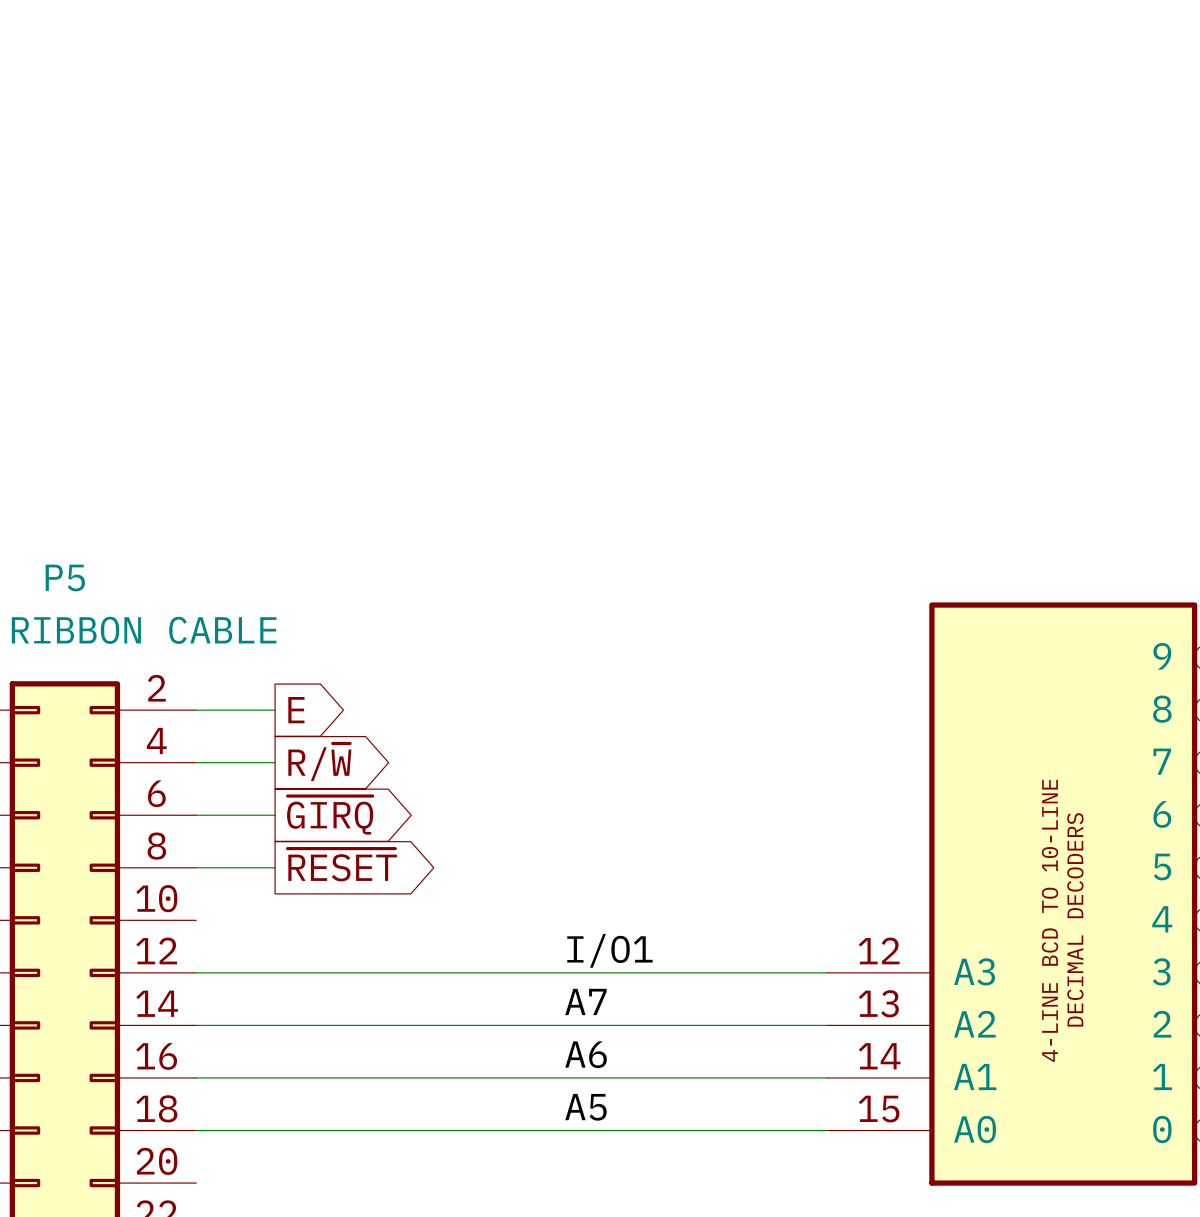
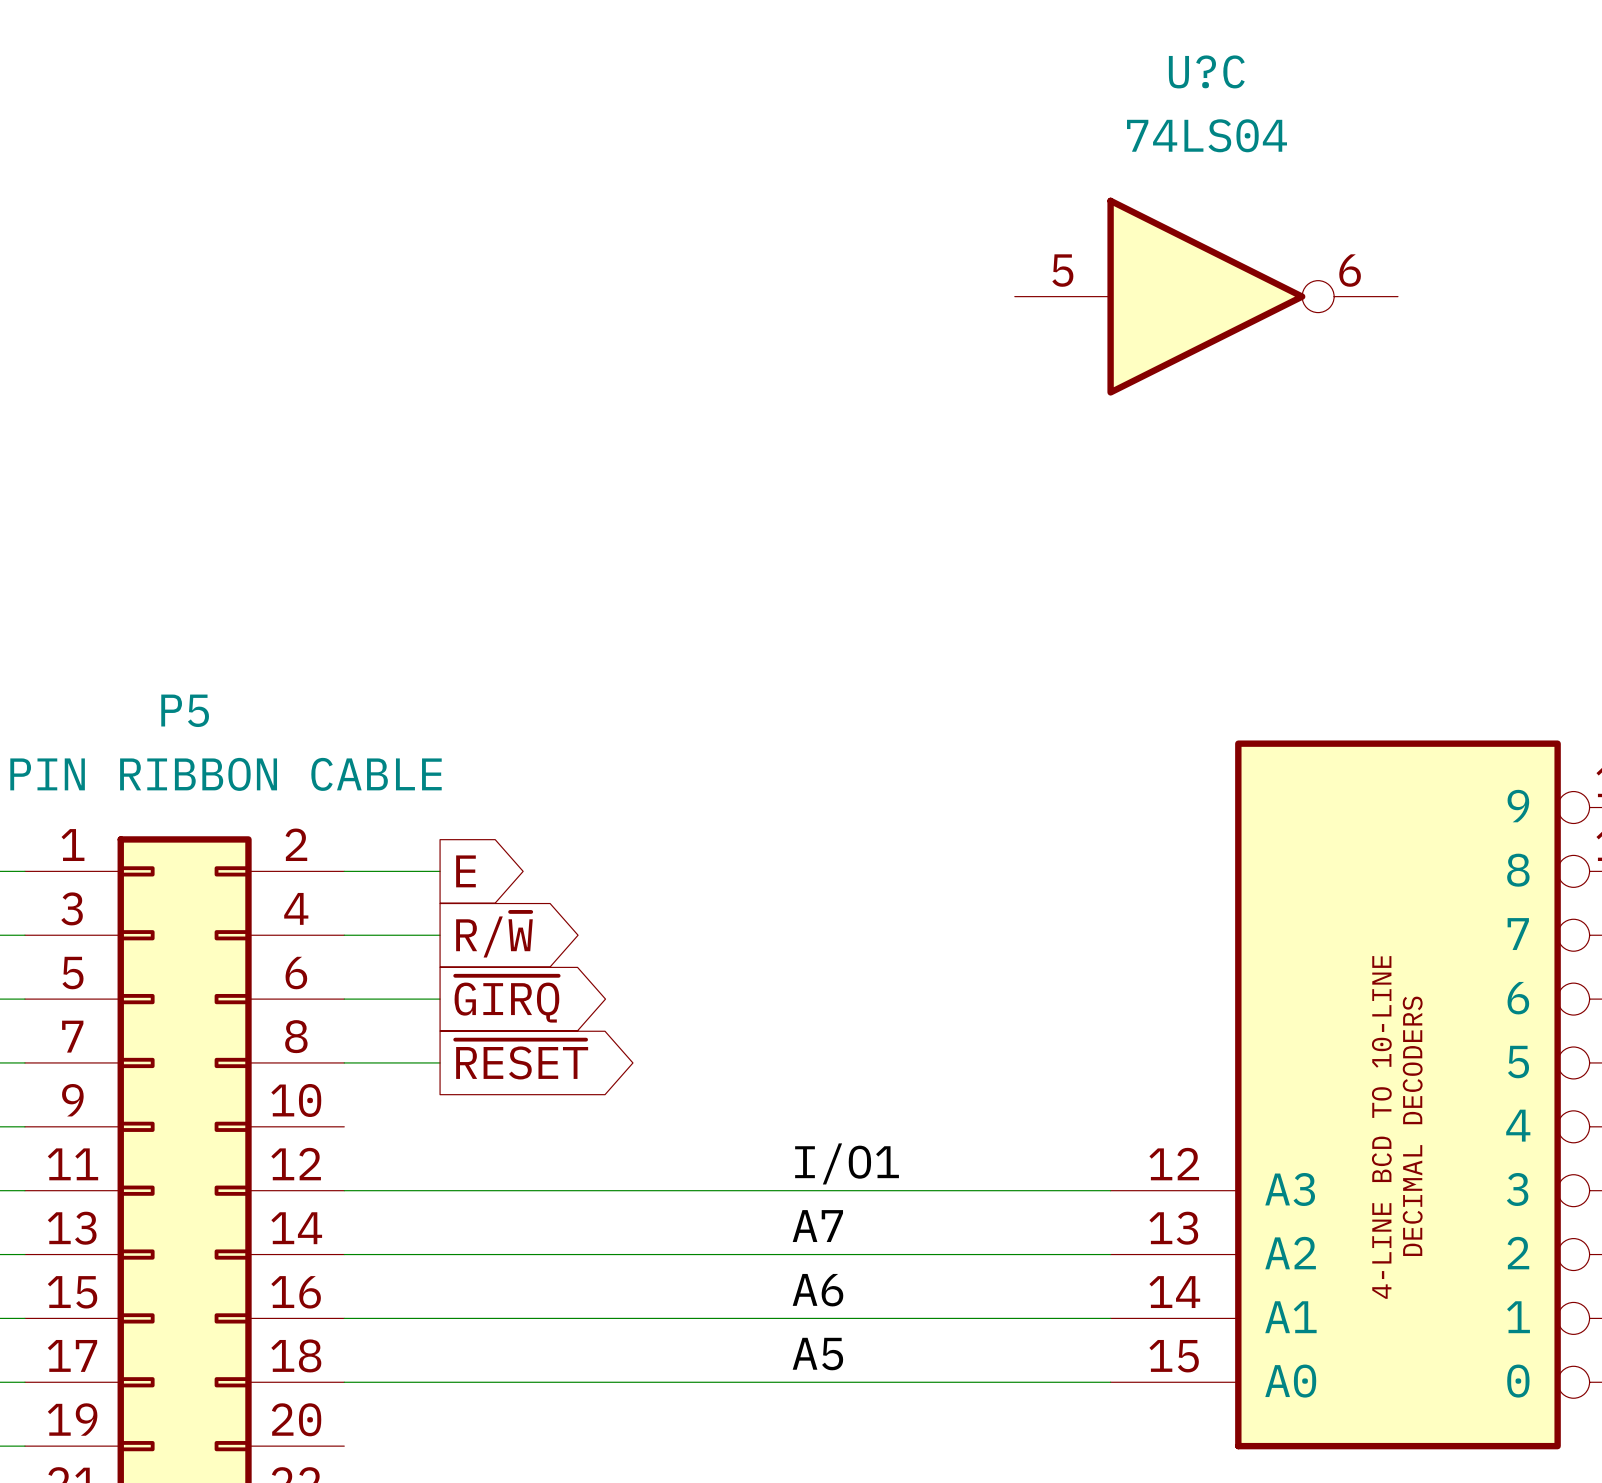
U?C: none -> 74LS04 (1206, 296)

